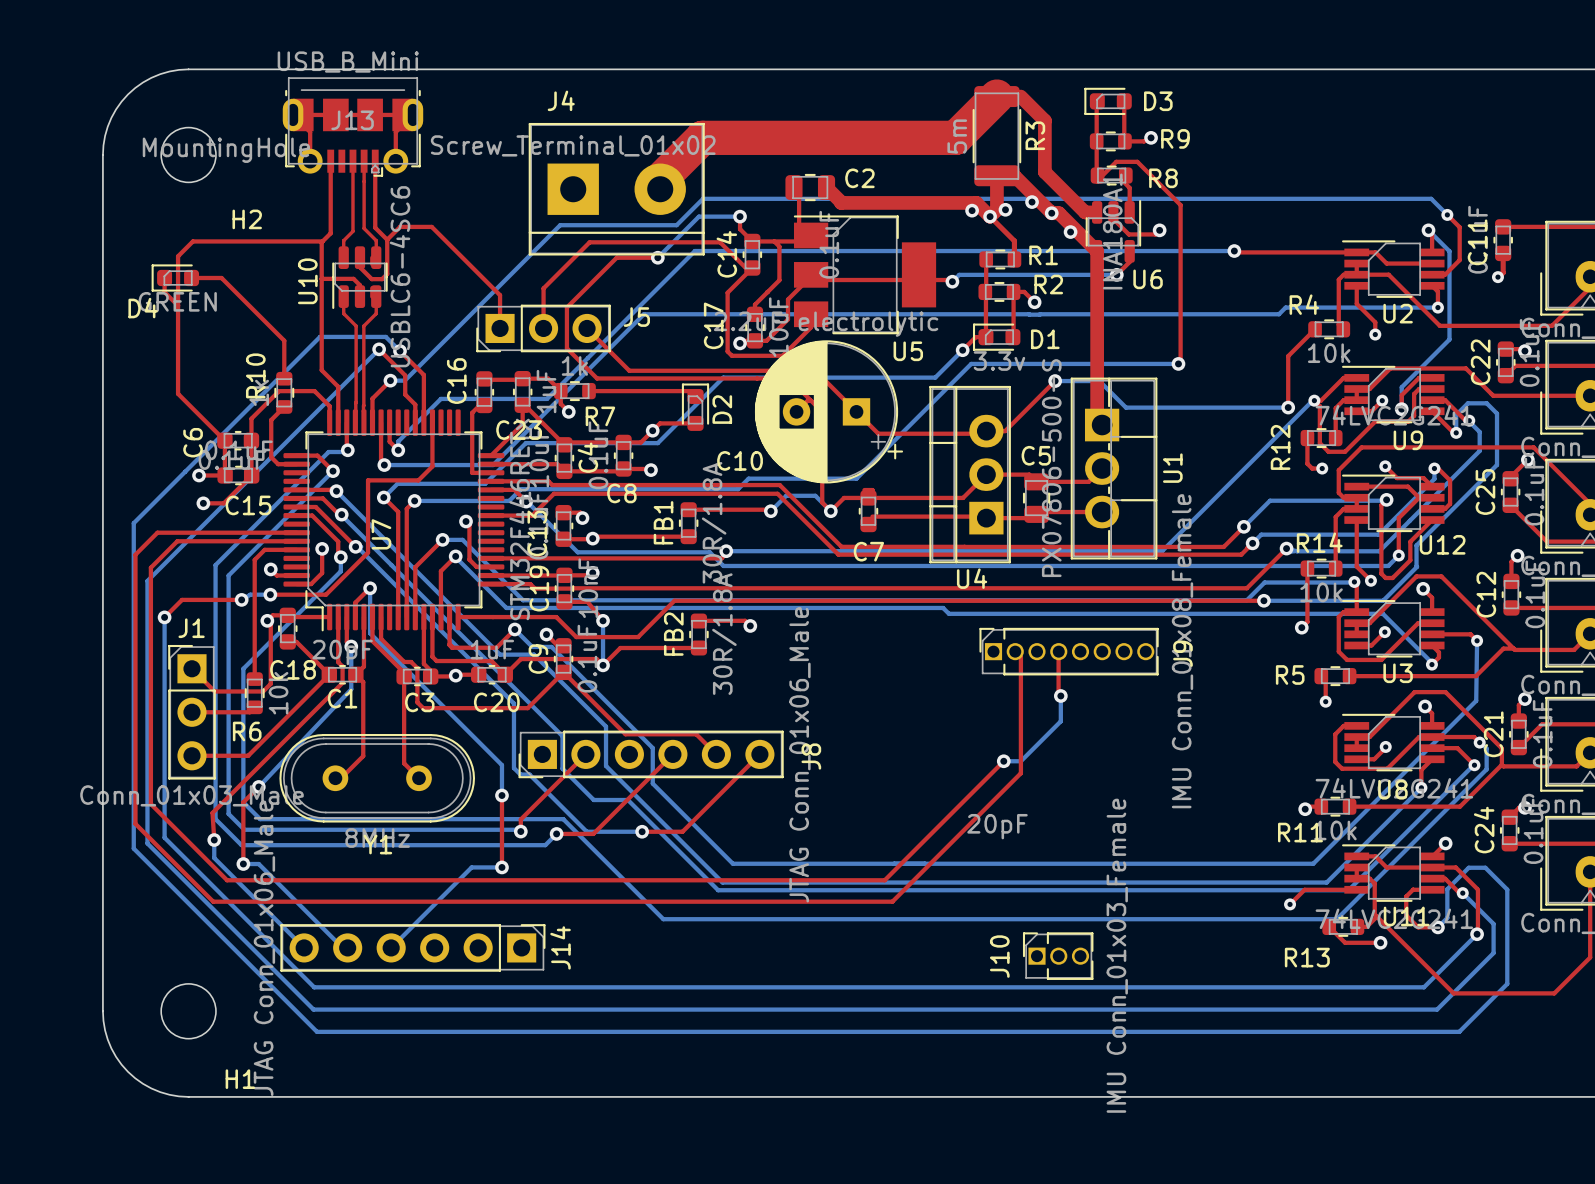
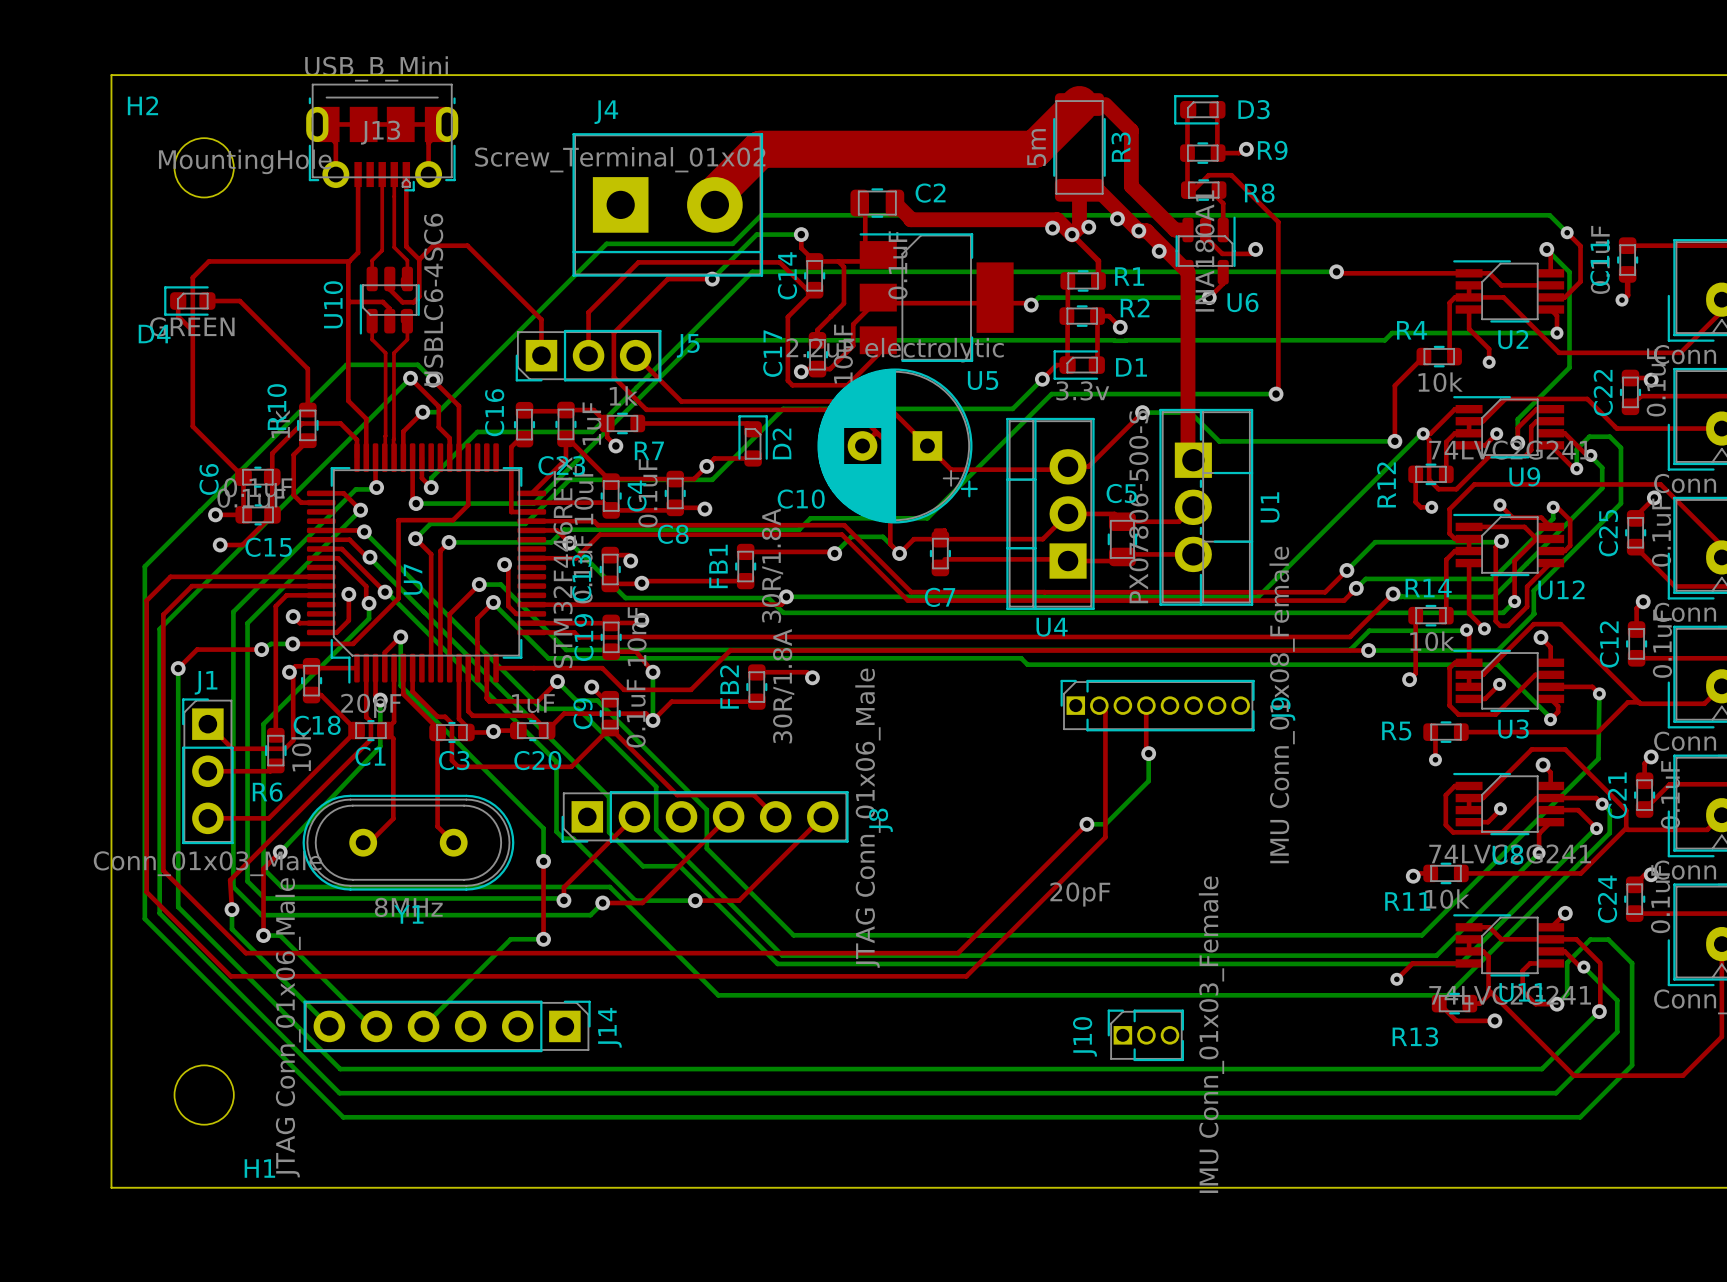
board edge: (188, 69) (160, 74) (143, 82) (128, 94) (116, 109) (107, 126) (102, 154) -> (204, 75) (111, 75) (111, 167)
H2 name position: H2 (247, 219) -> H2 (142, 105)
board edge: (102, 1011) (105, 1030) (111, 1048) (128, 1071) (143, 1083) (160, 1092) (188, 1096) -> (111, 1095) (111, 1187) (204, 1187)

